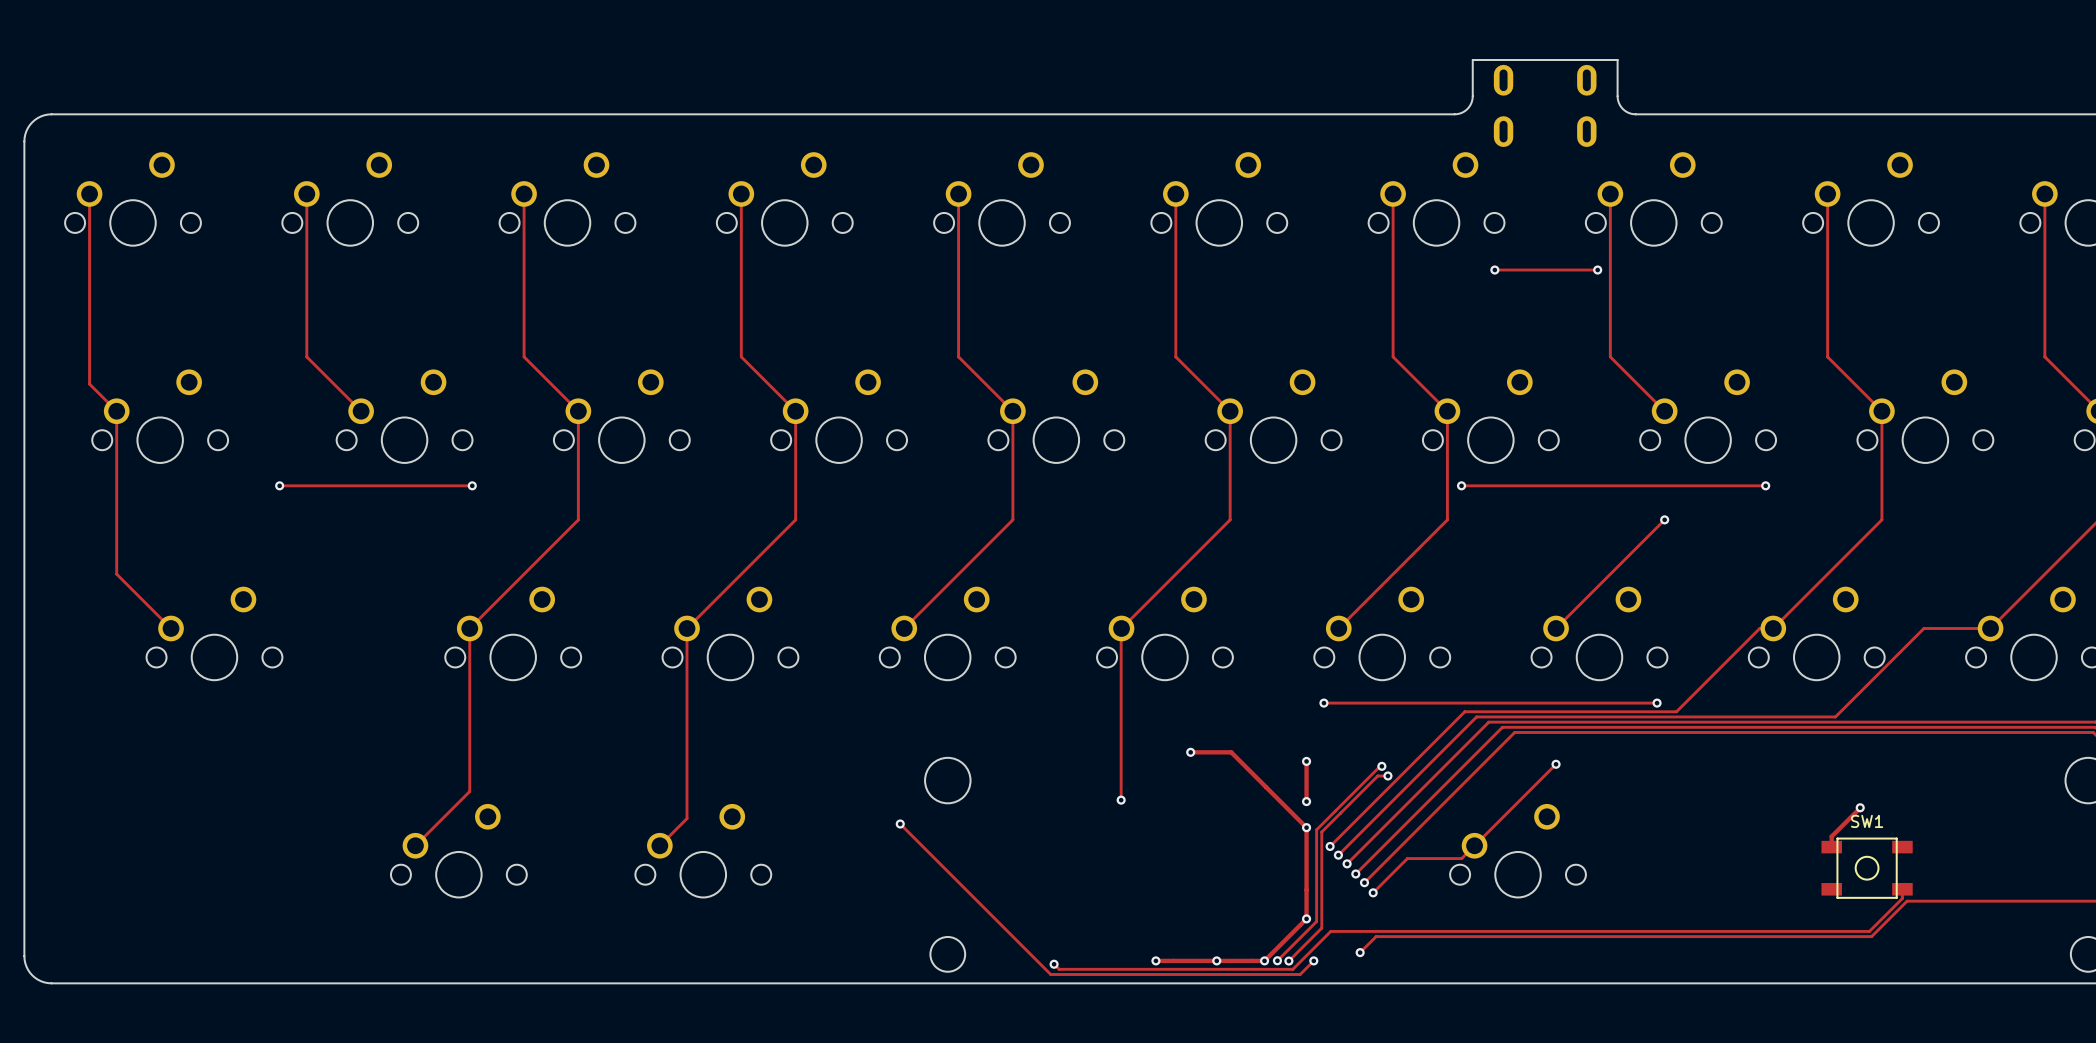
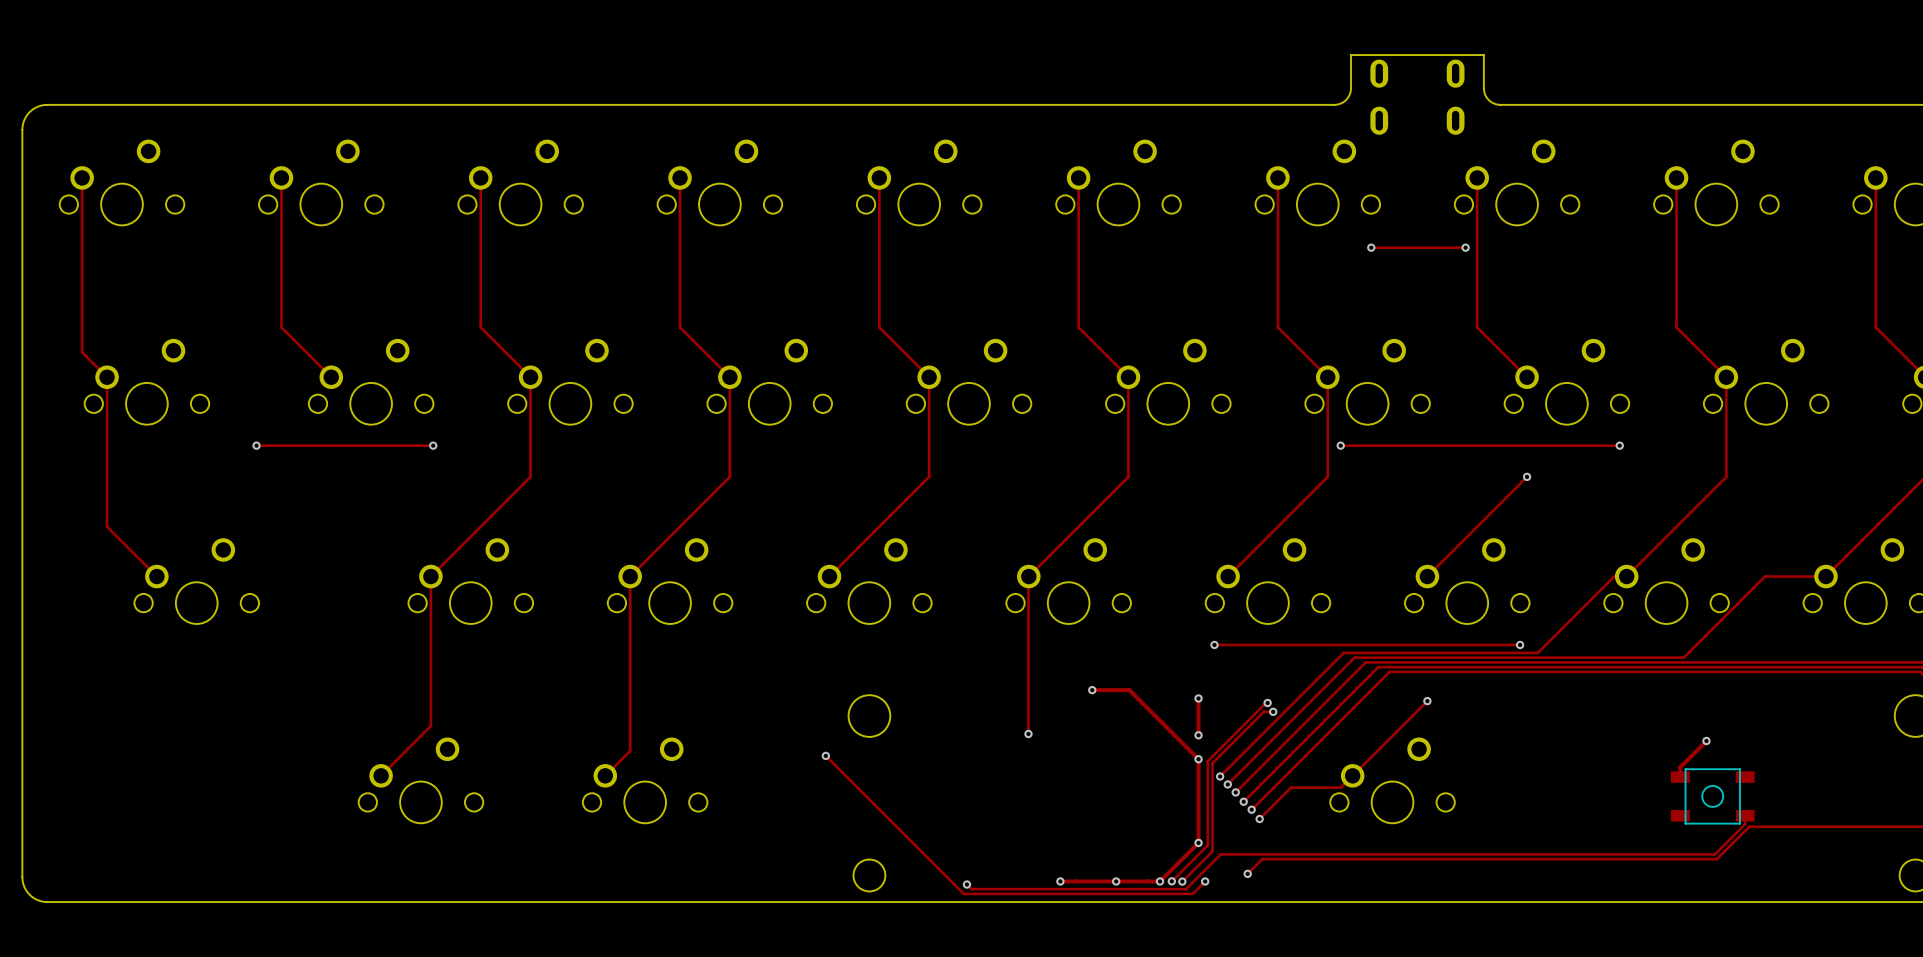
SW1 name: SW1 (1867, 821) -> none

